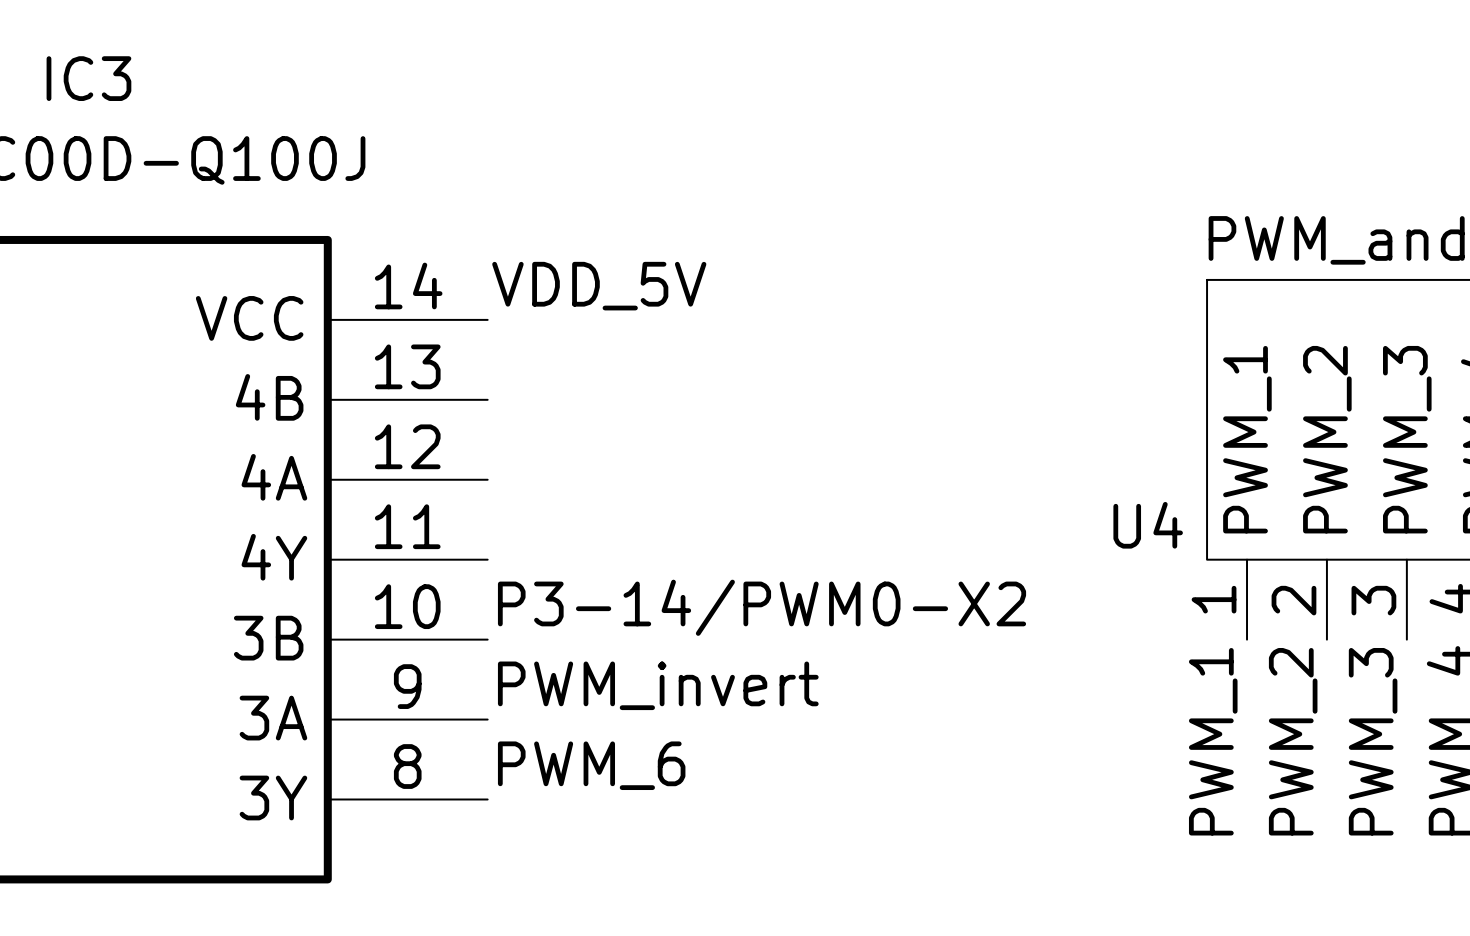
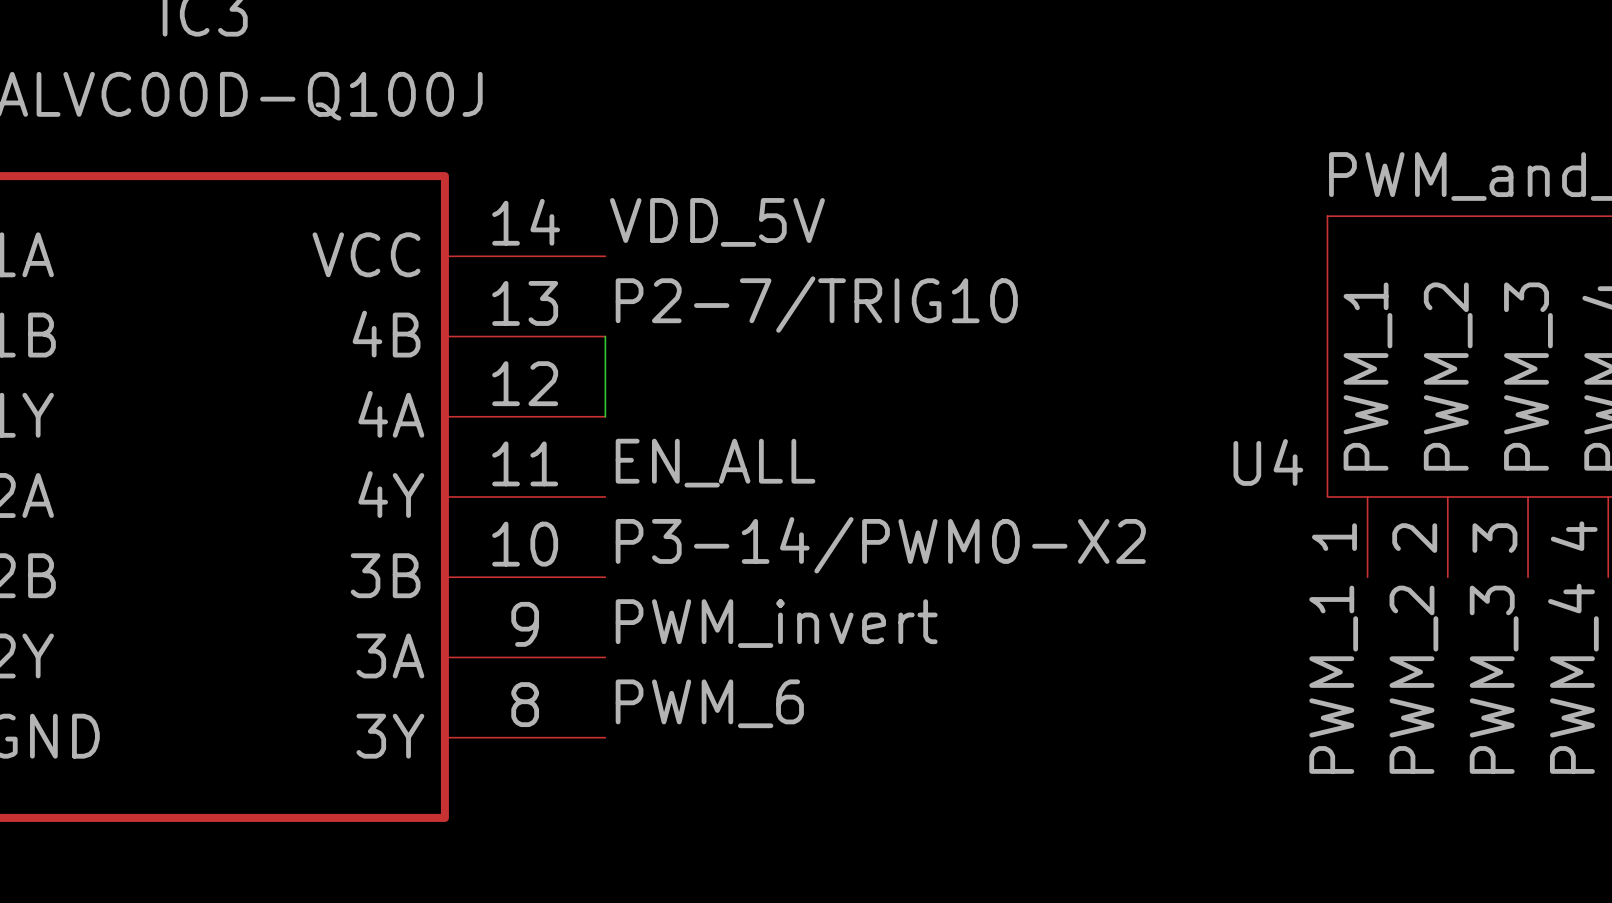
label: none -> P2-7/TRIG10 (816, 304)
wire: none -> (605, 336) (605, 416)
label: none -> EN_ALL (715, 463)

